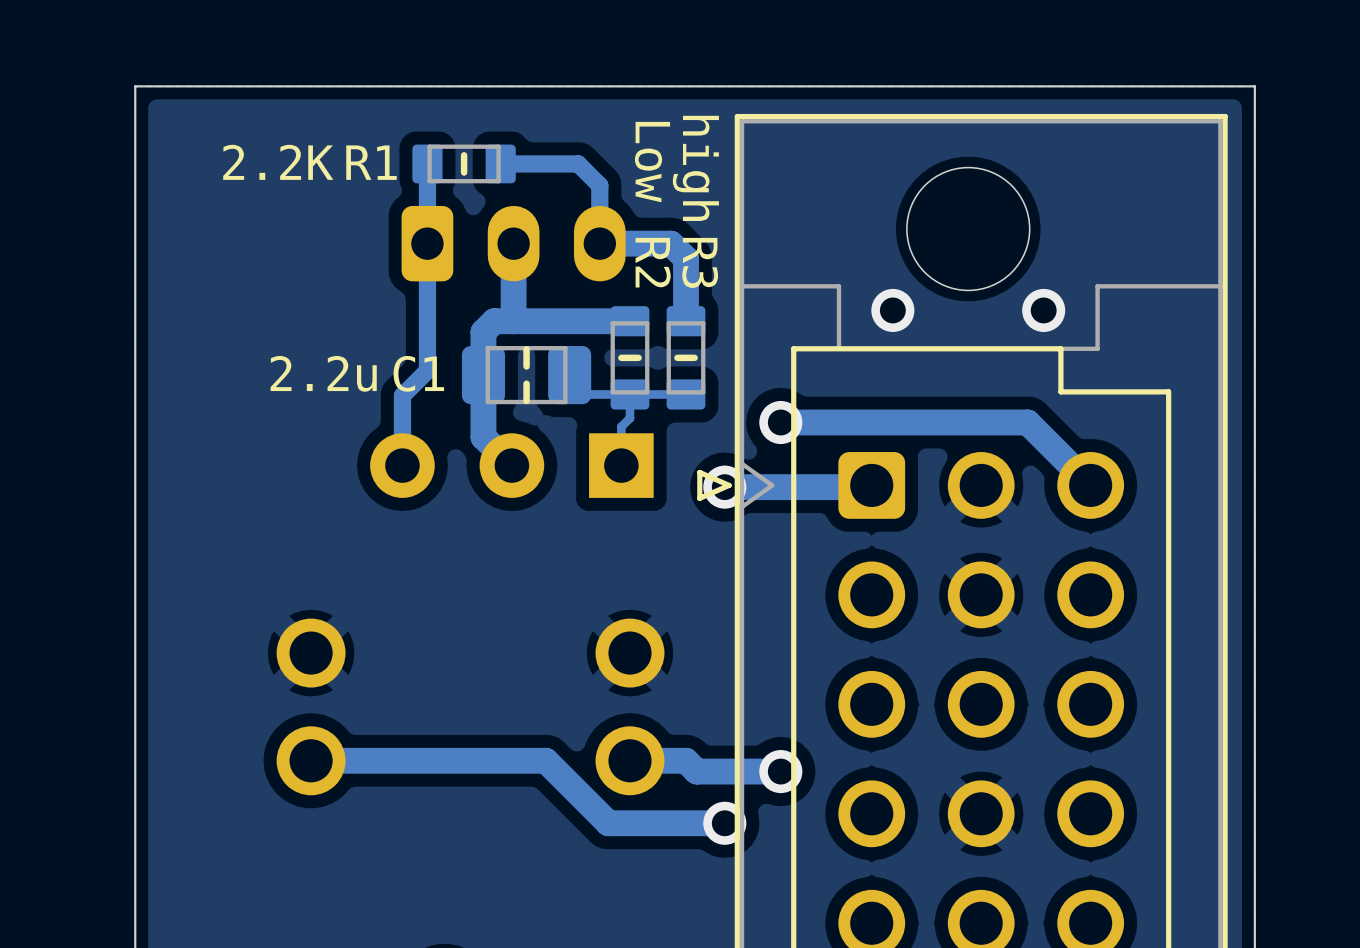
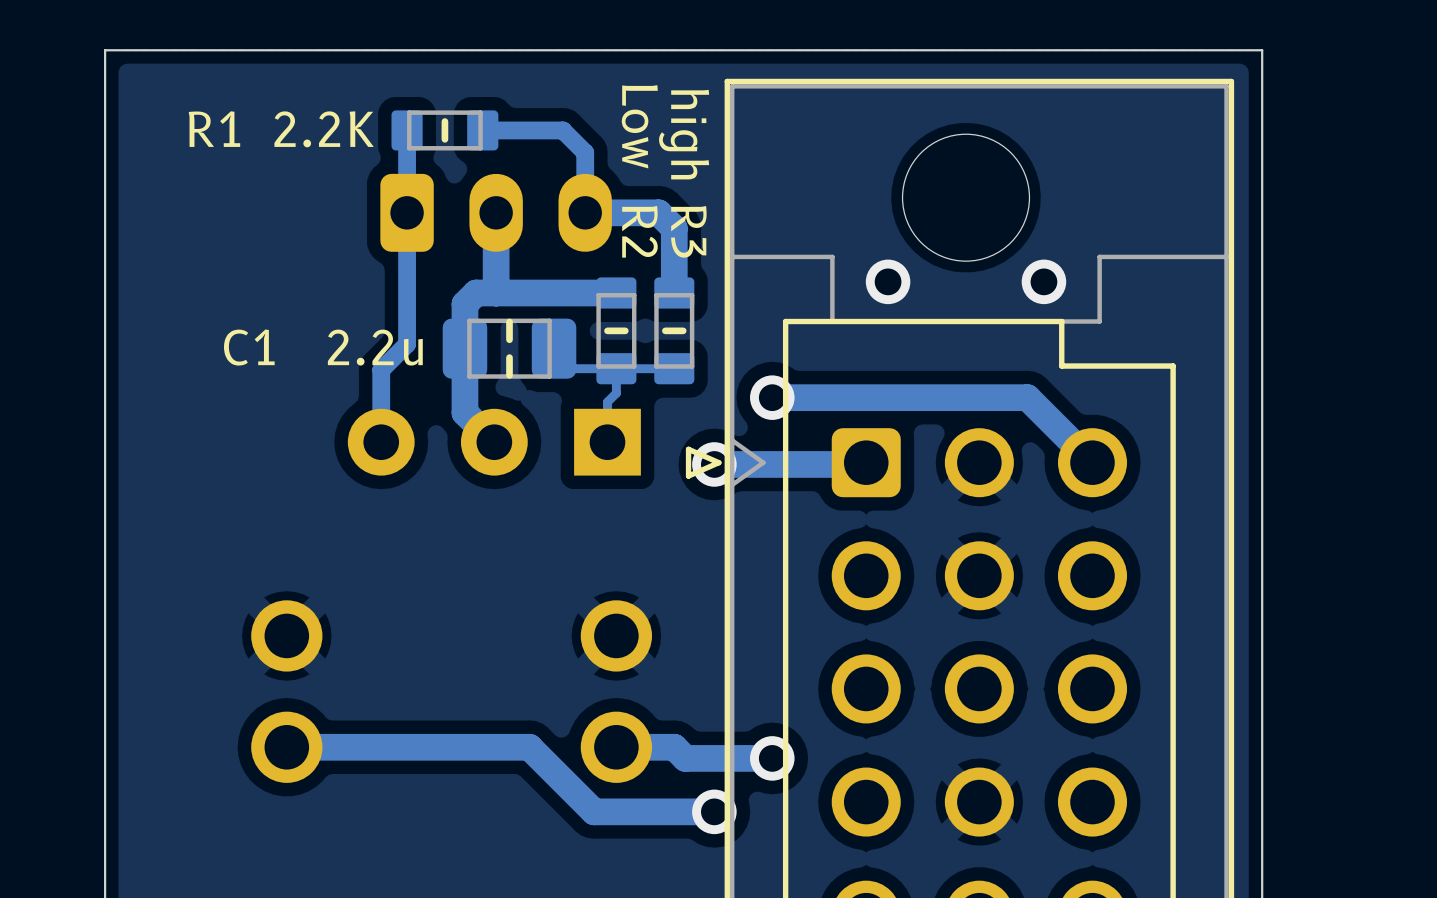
R1 value position: 2.2K (278, 162) -> 2.2K (324, 129)
R1 name position: R1 (371, 162) -> R1 (214, 129)
C1 value position: 2.2u (323, 373) -> 2.2u (375, 347)
C1 name position: C1 (418, 373) -> C1 (249, 347)

